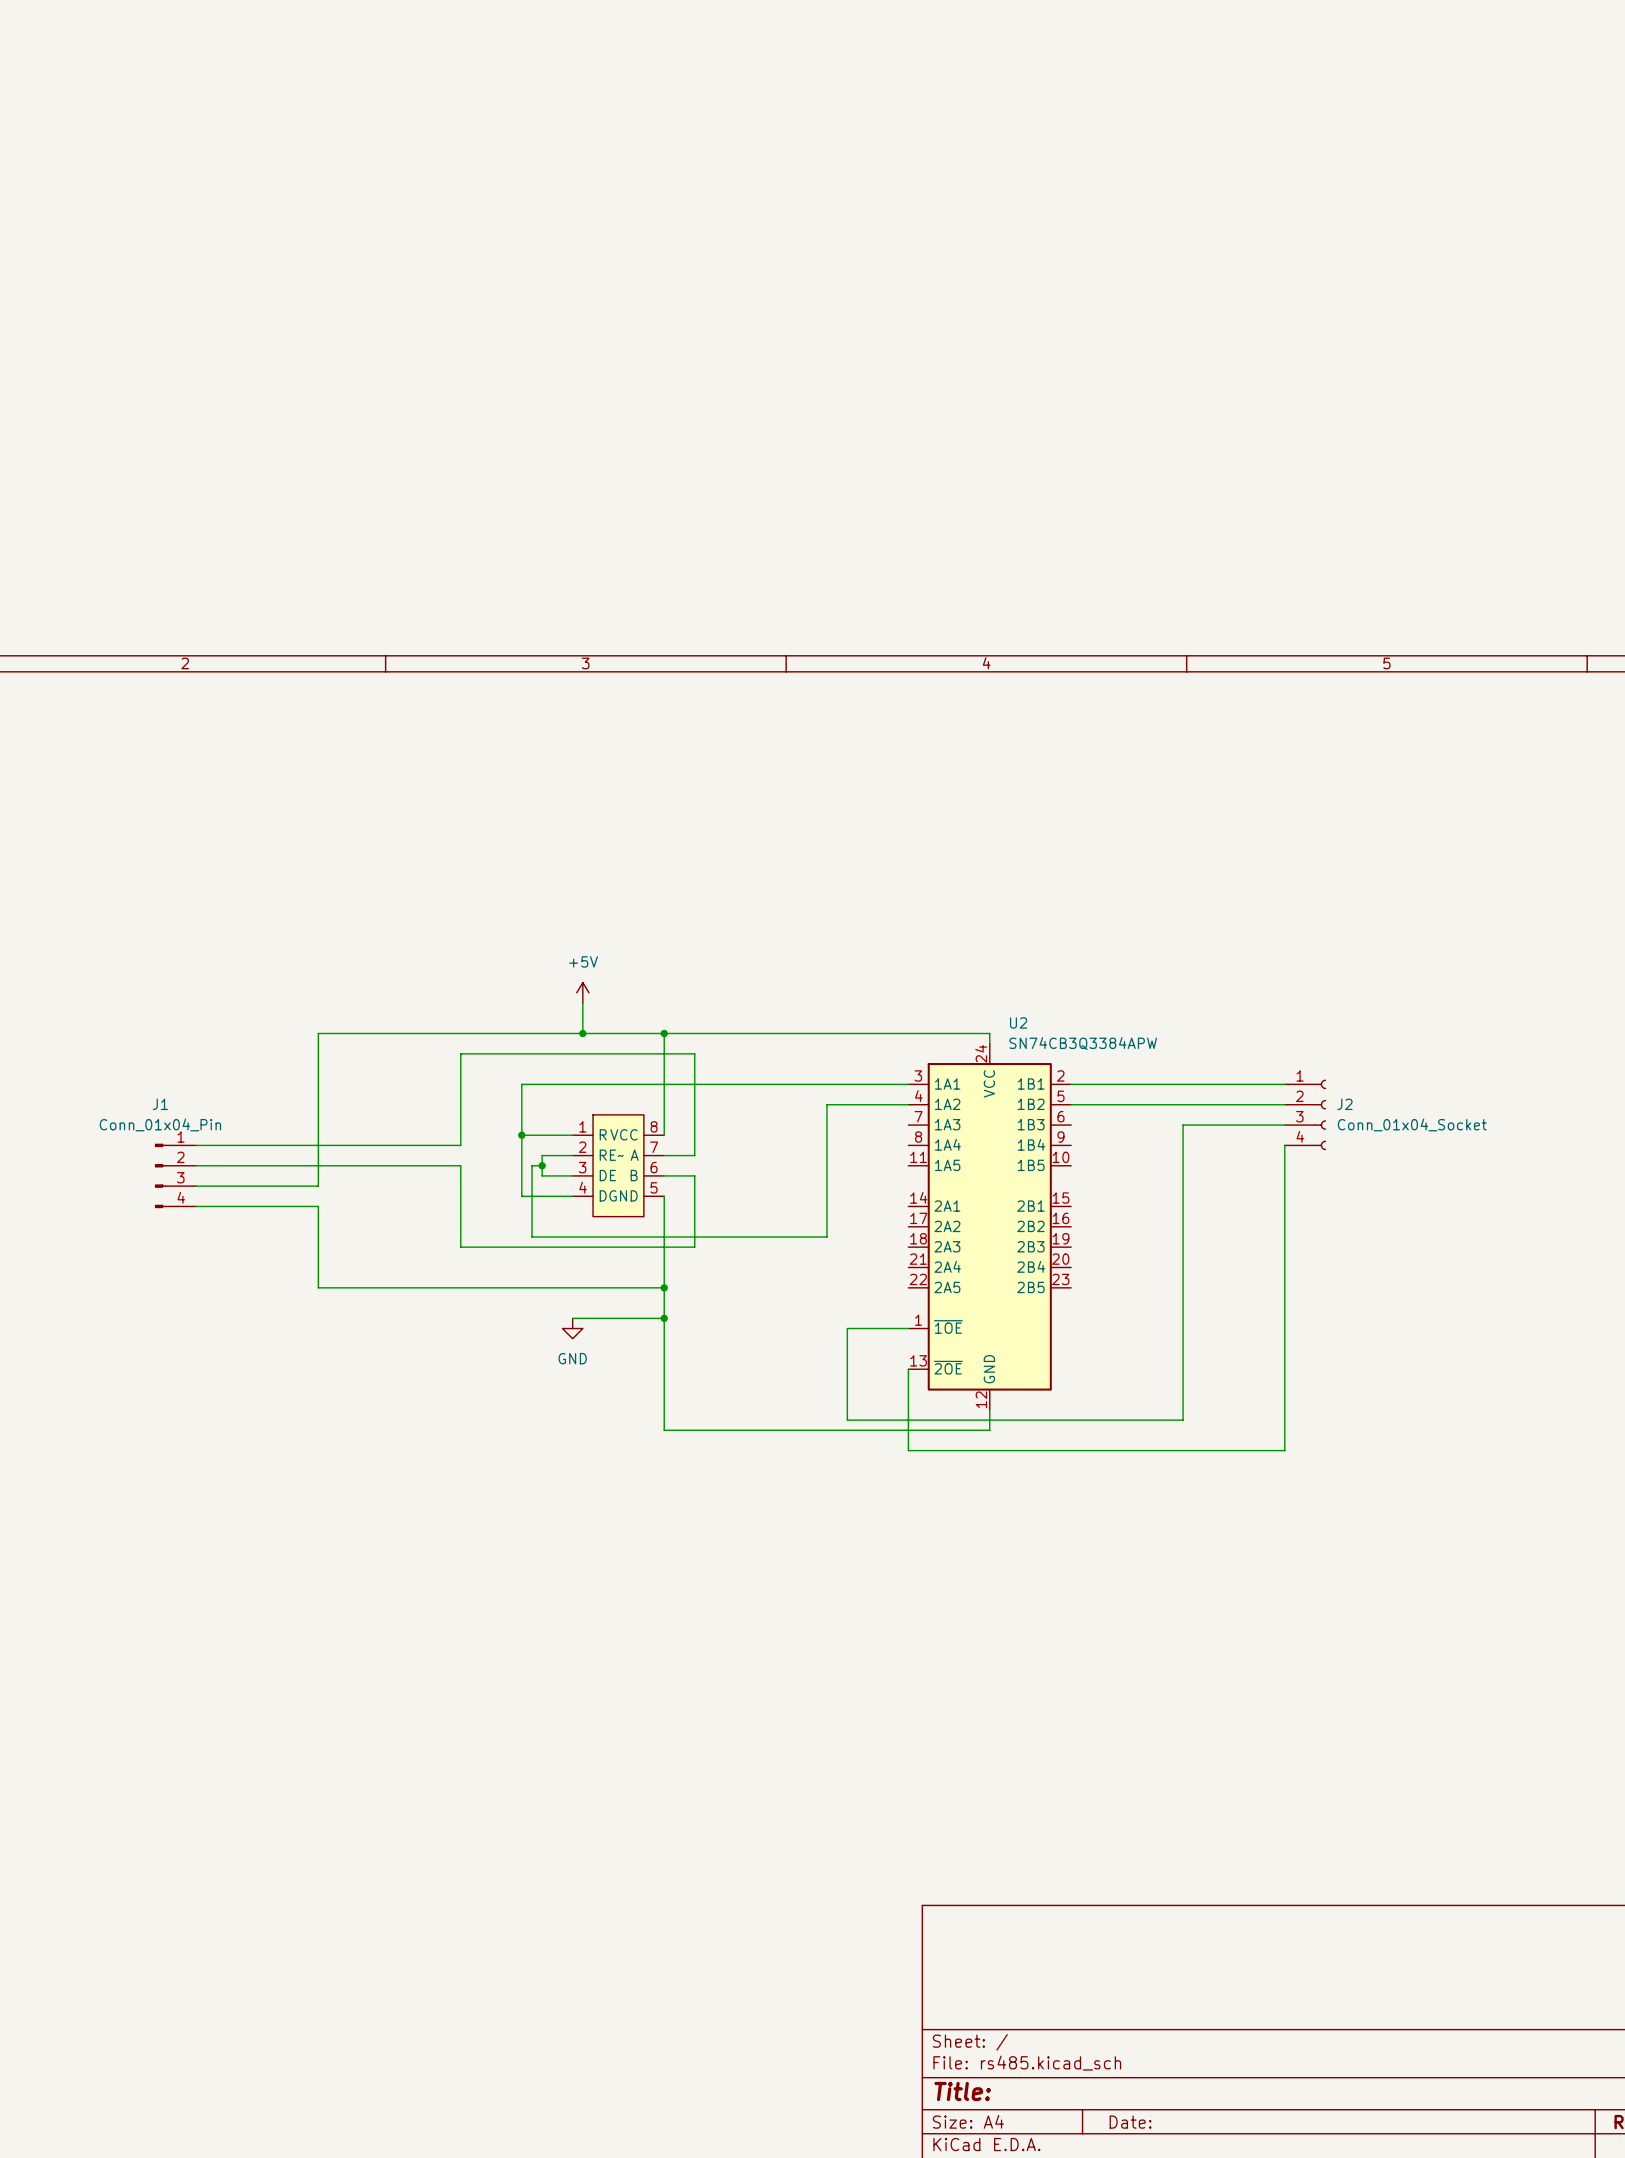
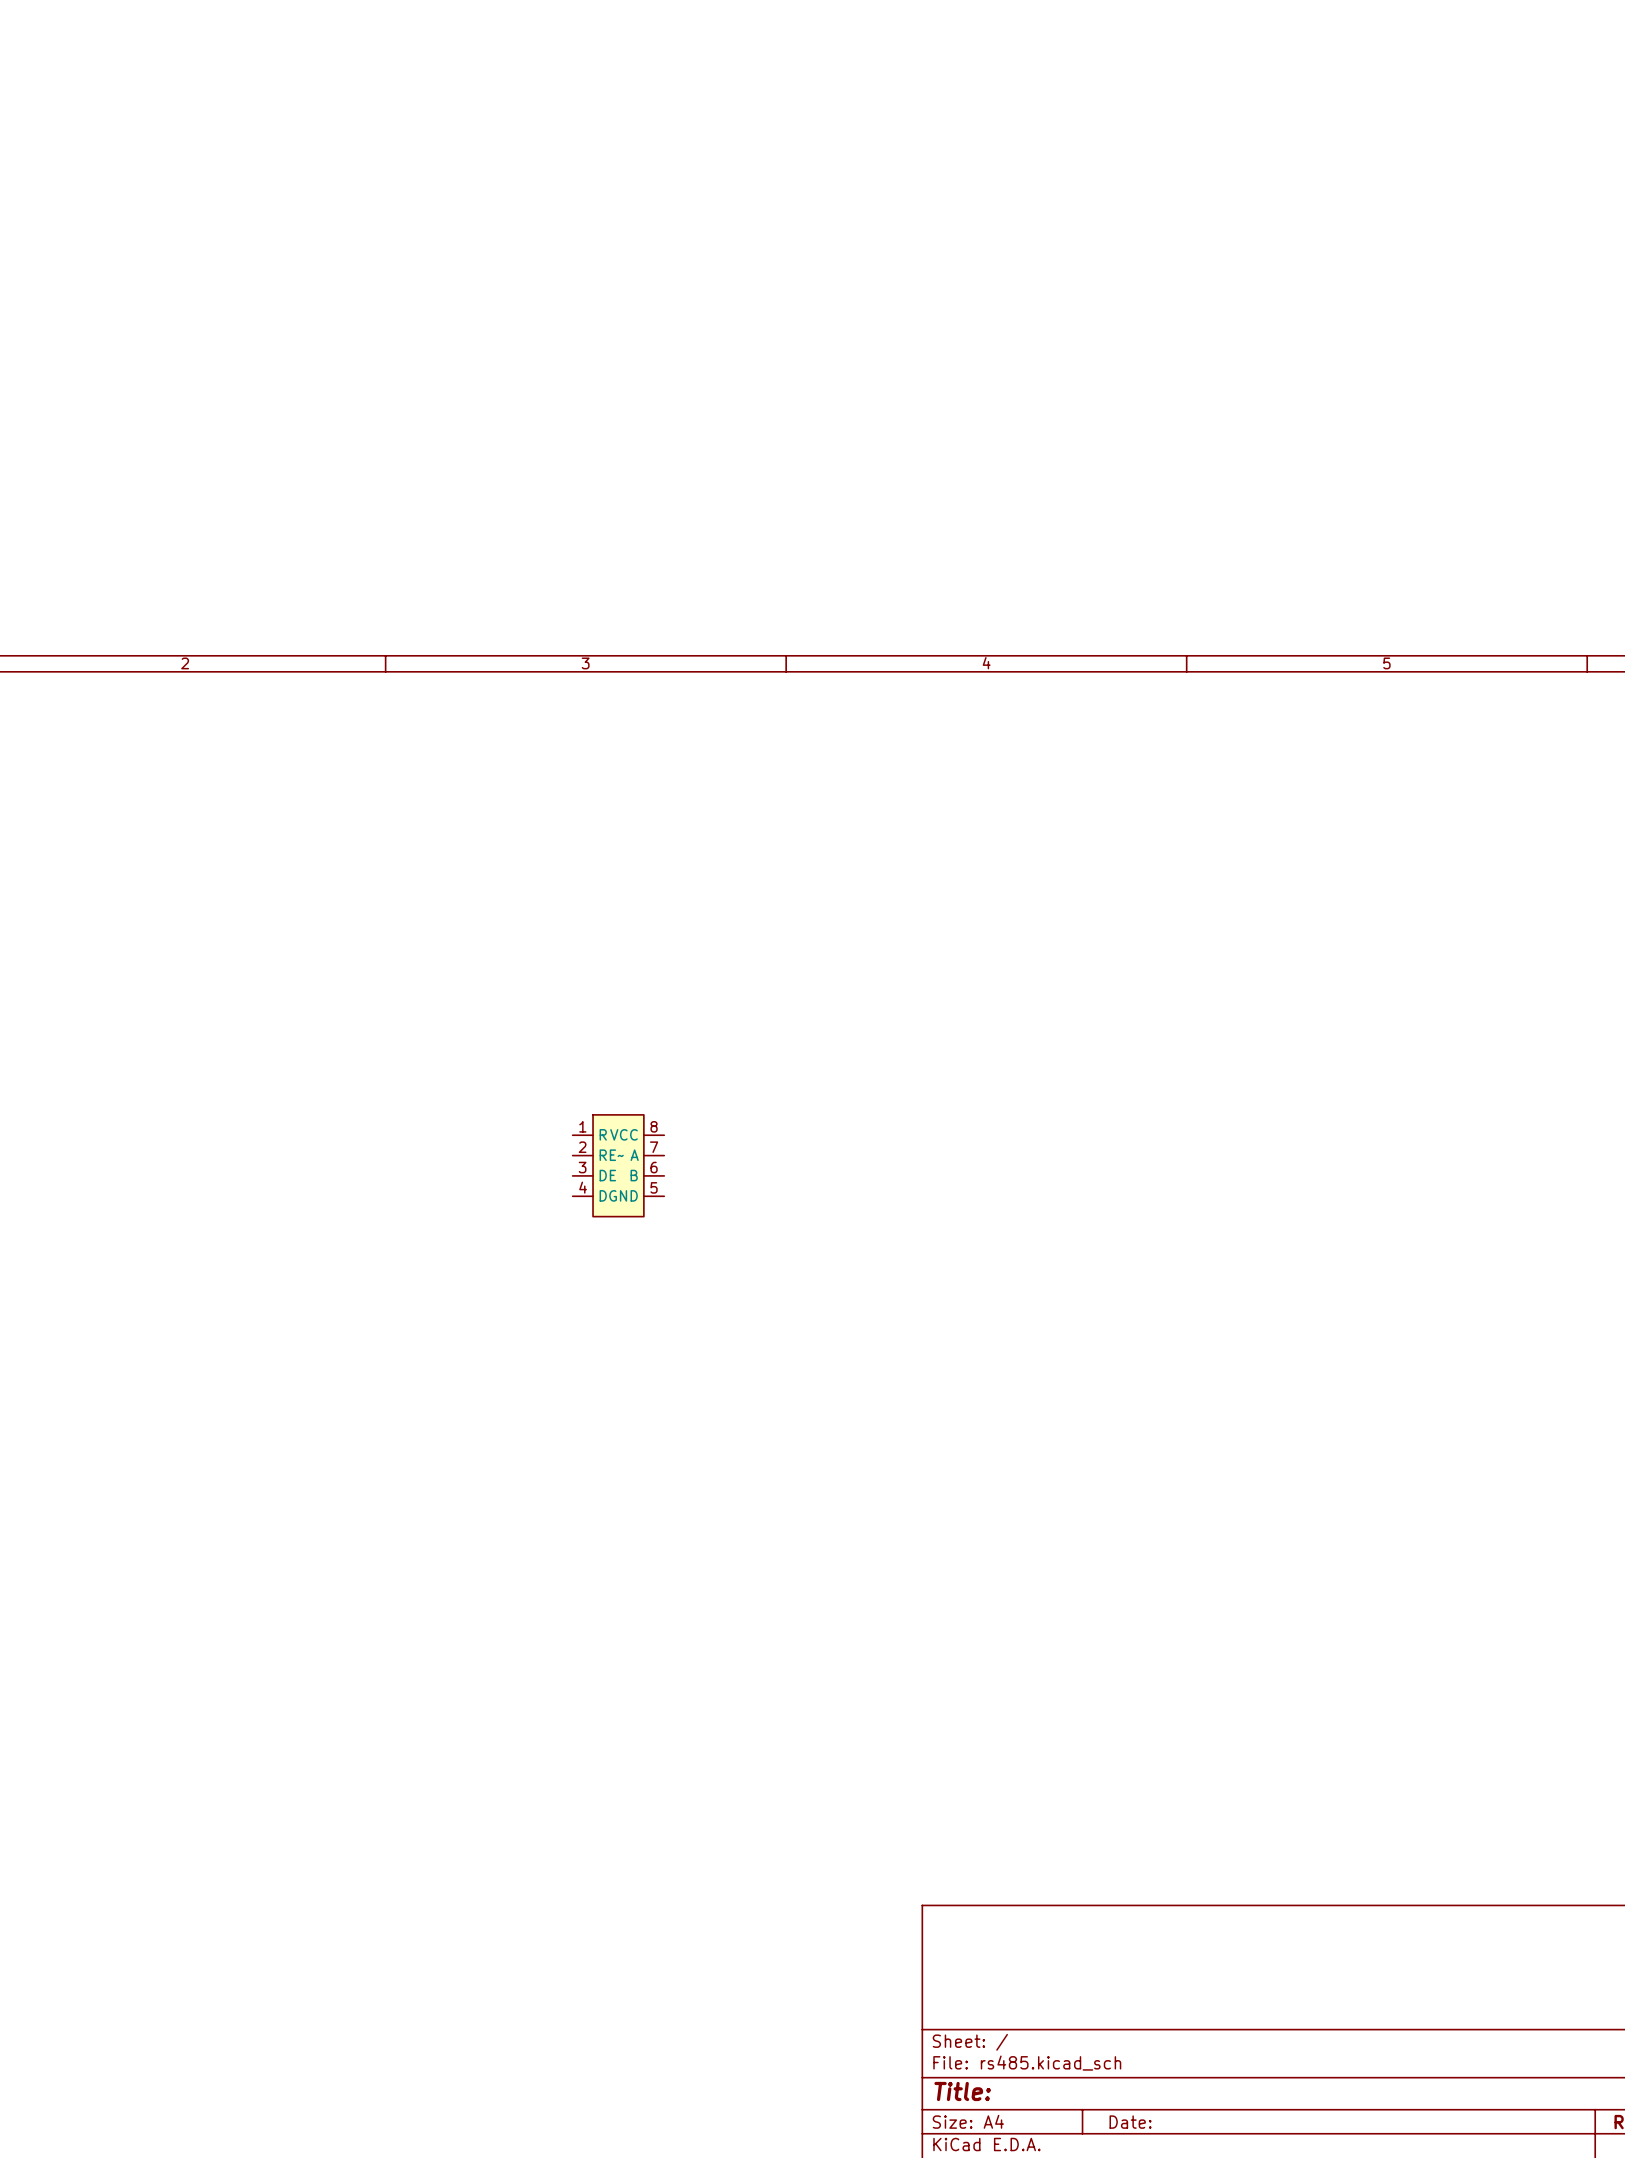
power symbol: +5V (582, 992) -> none
wire: (582, 1002) (582, 1033) -> none
junction: (582, 1033) -> none
wire: (664, 1033) (664, 1135) -> none
junction: (664, 1033) -> none
wire: (989, 1043) (989, 1033) (318, 1033) (318, 1186) (196, 1186) -> none
wire: (908, 1084) (521, 1084) (521, 1196) (572, 1196) -> none
wire: (1071, 1084) (1284, 1084) -> none
wire: (908, 1104) (827, 1104) (827, 1236) (531, 1236) (531, 1165) (542, 1165) -> none
wire: (1071, 1104) (1284, 1104) -> none
J2: Conn_01x04_Socket (1305, 1114) -> none
wire: (1284, 1125) (1183, 1125) (1183, 1420) (847, 1420) (847, 1328) (908, 1328) -> none
wire: (521, 1135) (572, 1135) -> none
junction: (521, 1135) -> none
wire: (196, 1145) (460, 1145) (460, 1053) (694, 1053) (694, 1155) (664, 1155) -> none
wire: (1284, 1145) (1284, 1450) (908, 1450) (908, 1369) -> none
wire: (572, 1155) (542, 1155) (542, 1175) (572, 1175) -> none
wire: (196, 1165) (460, 1165) (460, 1247) (694, 1247) (694, 1175) (664, 1175) -> none
junction: (542, 1165) -> none
J1: Conn_01x04_Pin (175, 1175) -> none
wire: (664, 1196) (664, 1430) (989, 1430) (989, 1409) -> none
wire: (196, 1206) (318, 1206) (318, 1287) (664, 1287) -> none
U2: SN74CB3Q3384APW (989, 1226) -> none
junction: (664, 1287) -> none
wire: (572, 1318) (664, 1318) -> none
junction: (664, 1318) -> none
power symbol: GND (572, 1328) -> none

